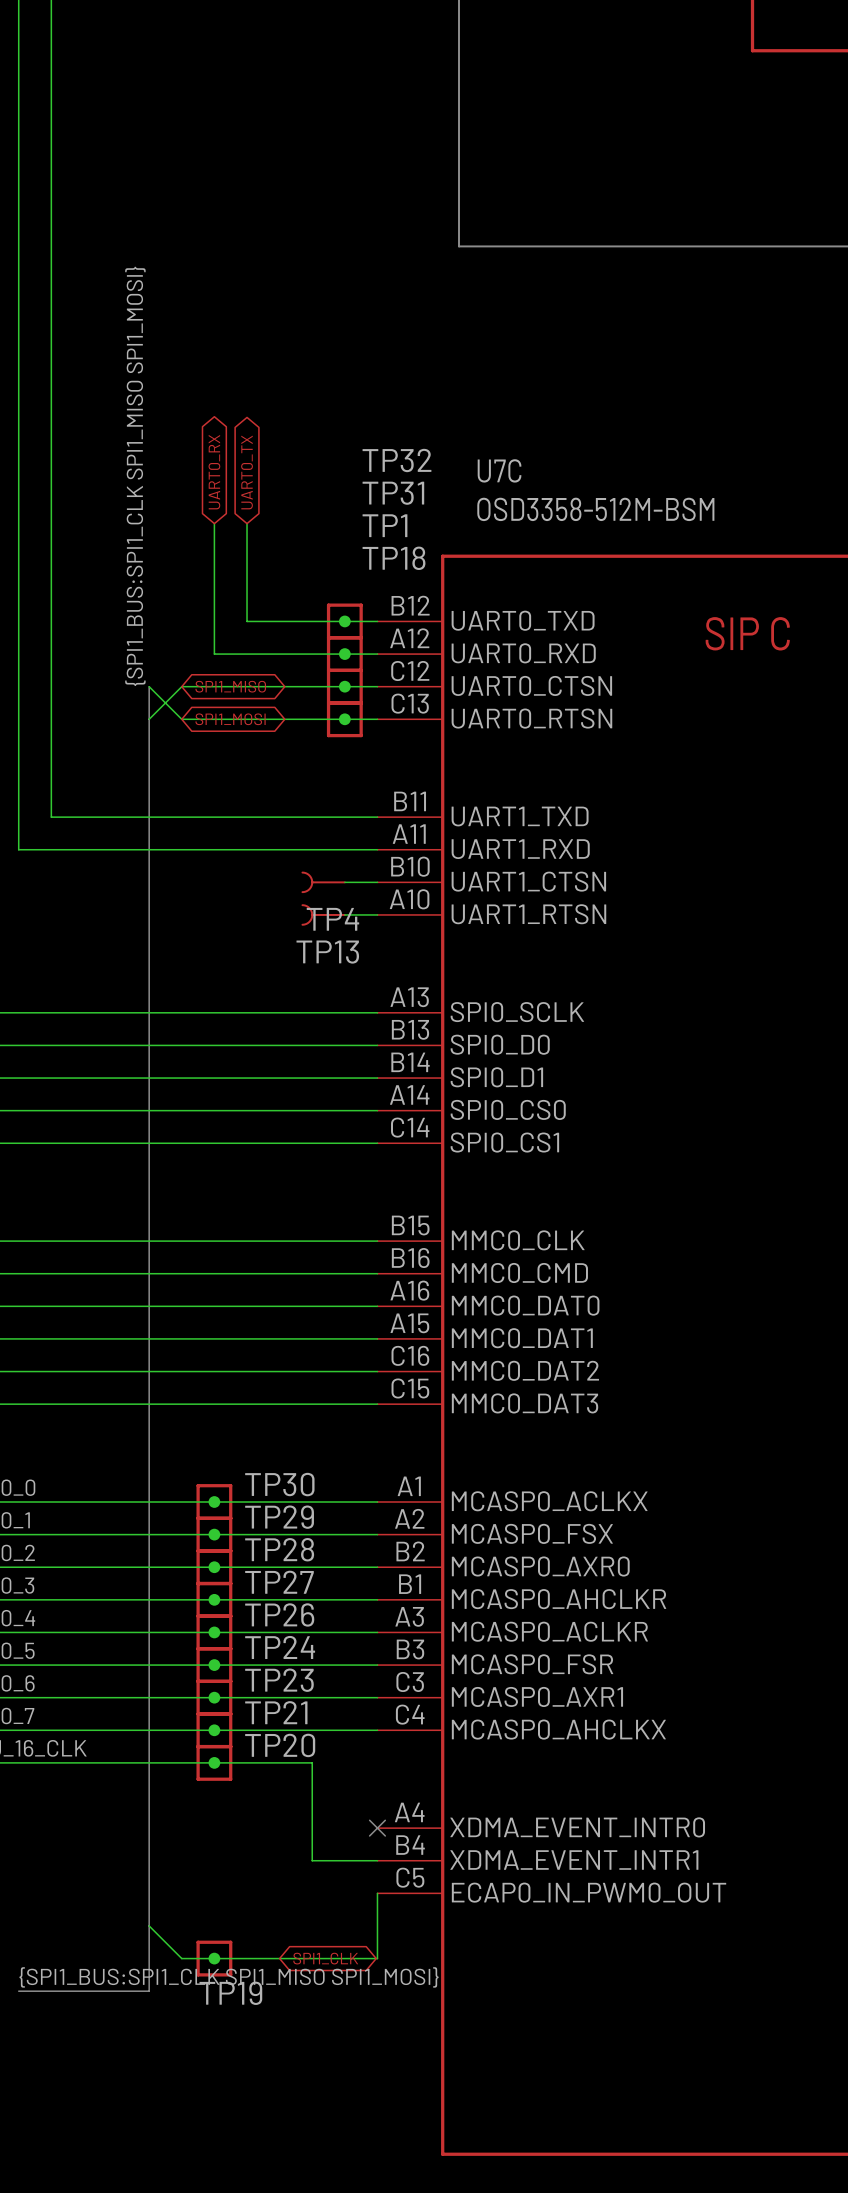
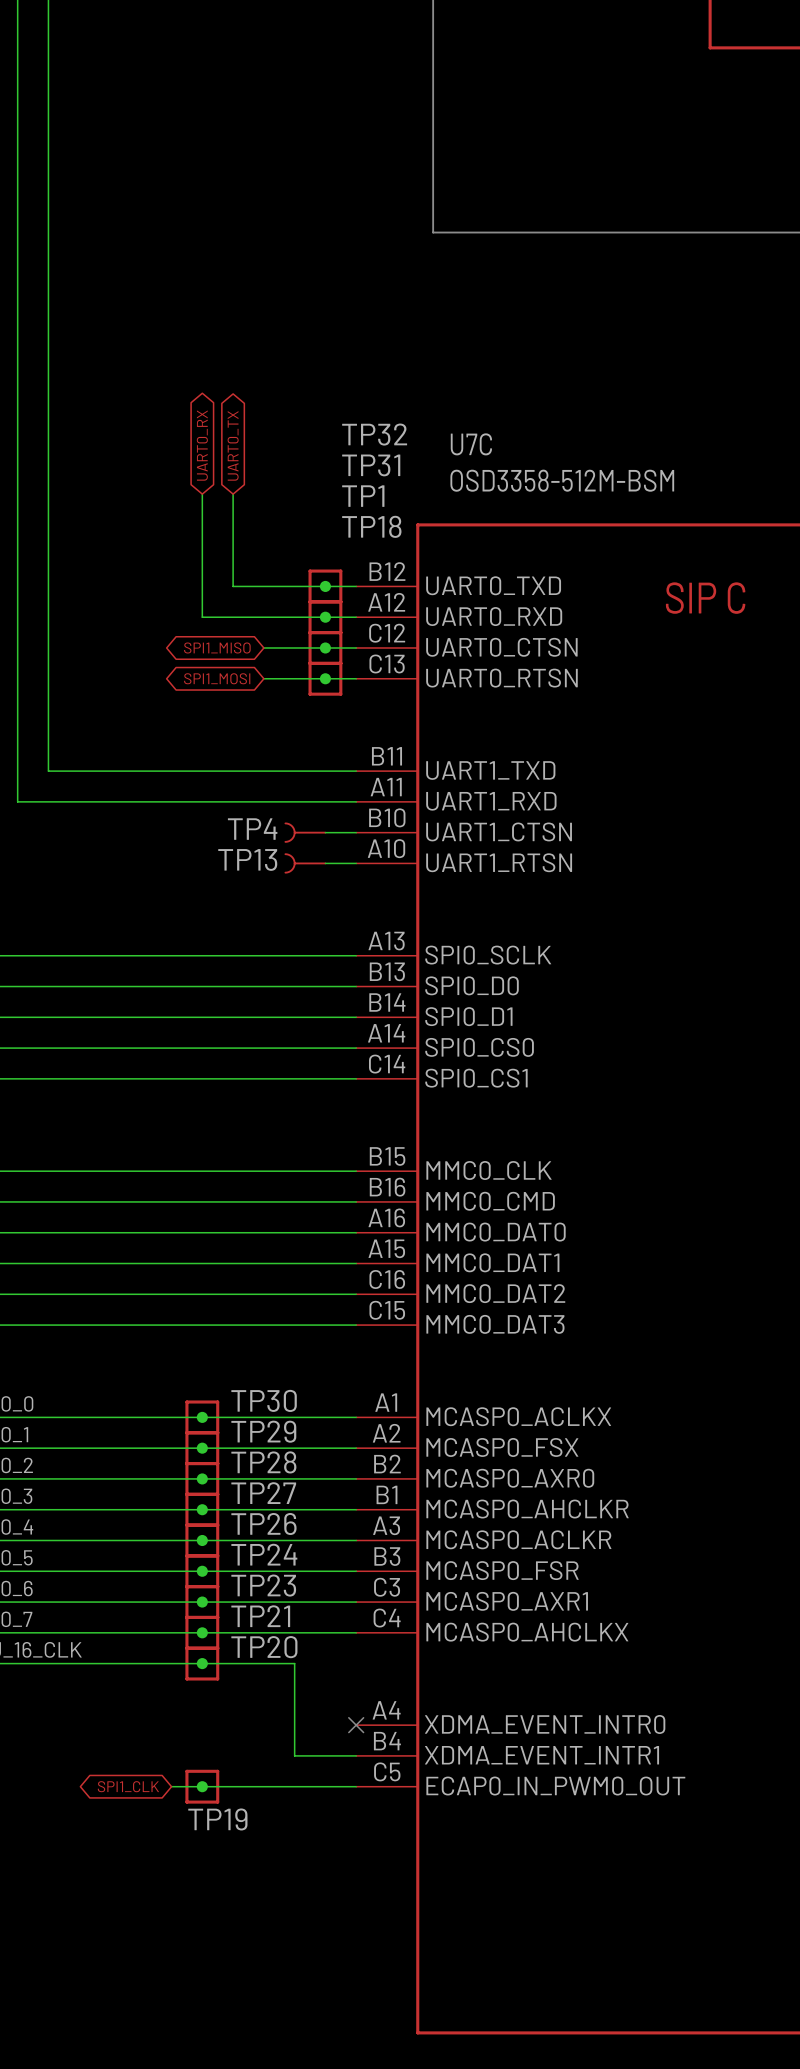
label: {SPI1_BUS:SPI1_CLK SPI1_MISO SPI1_MOSI} (135, 476) -> none
wire: (149, 686) (181, 719) (279, 719) -> none
bus: (149, 686) (149, 1991) (18, 1991) -> none
global label rotation: 0° (230, 686) -> 180° (217, 648)
wire: (279, 686) (181, 686) (149, 719) -> none
global label rotation: 0° (230, 719) -> 180° (217, 678)
TP4 name position: TP4 (332, 919) -> TP4 (252, 829)
TP13 name position: TP13 (327, 952) -> TP13 (247, 859)
wire: (377, 1893) (377, 1958) (181, 1958) (149, 1925) -> (356, 1786) (171, 1786)
junction position: (214, 1958) -> (202, 1786)
TP19 position: (214, 1958) -> (202, 1786)
global label rotation: 0° (325, 1958) -> 180° (128, 1786)
global label position: SPI1_CLK (325, 1958) -> SPI1_CLK (128, 1786)
label: {SPI1_BUS:SPI1_CLK SPI1_MISO SPI1_MOSI} (229, 1977) -> none

